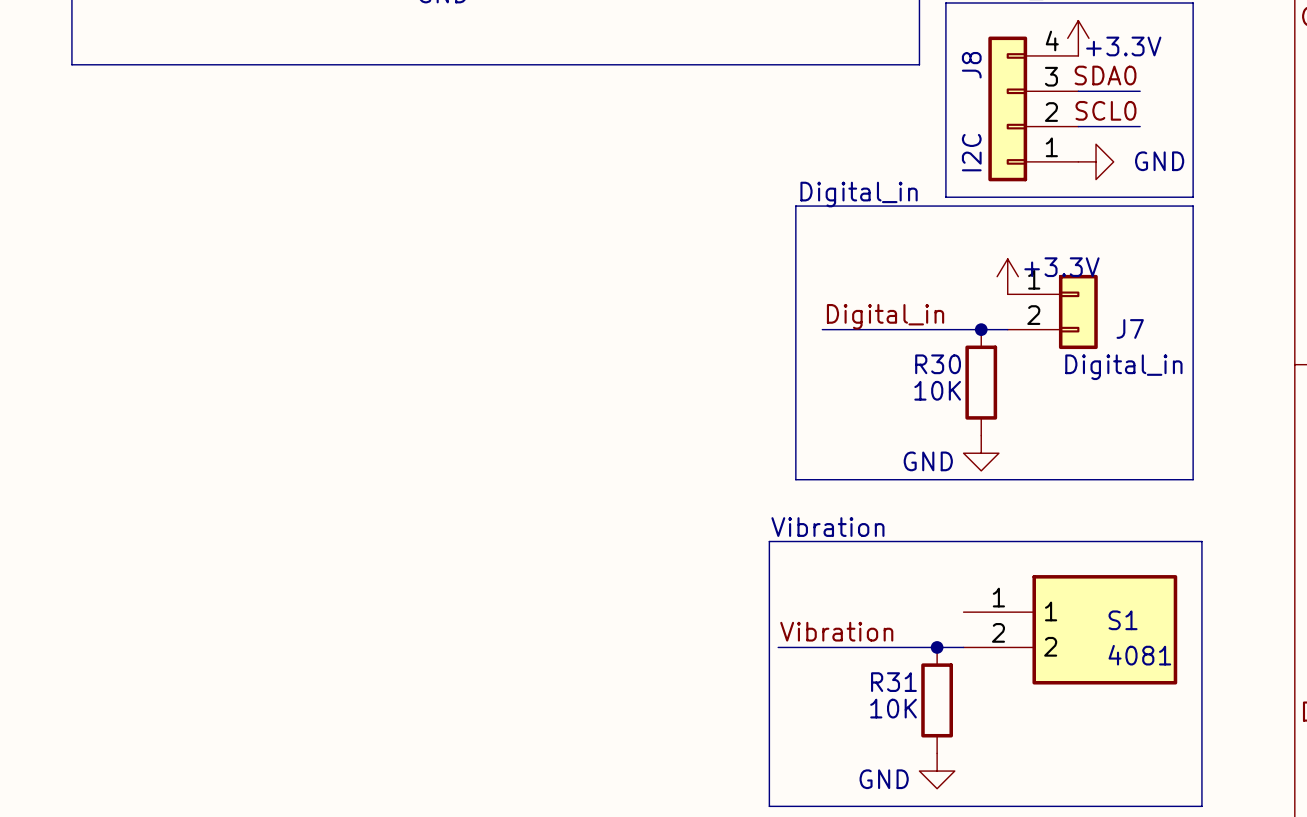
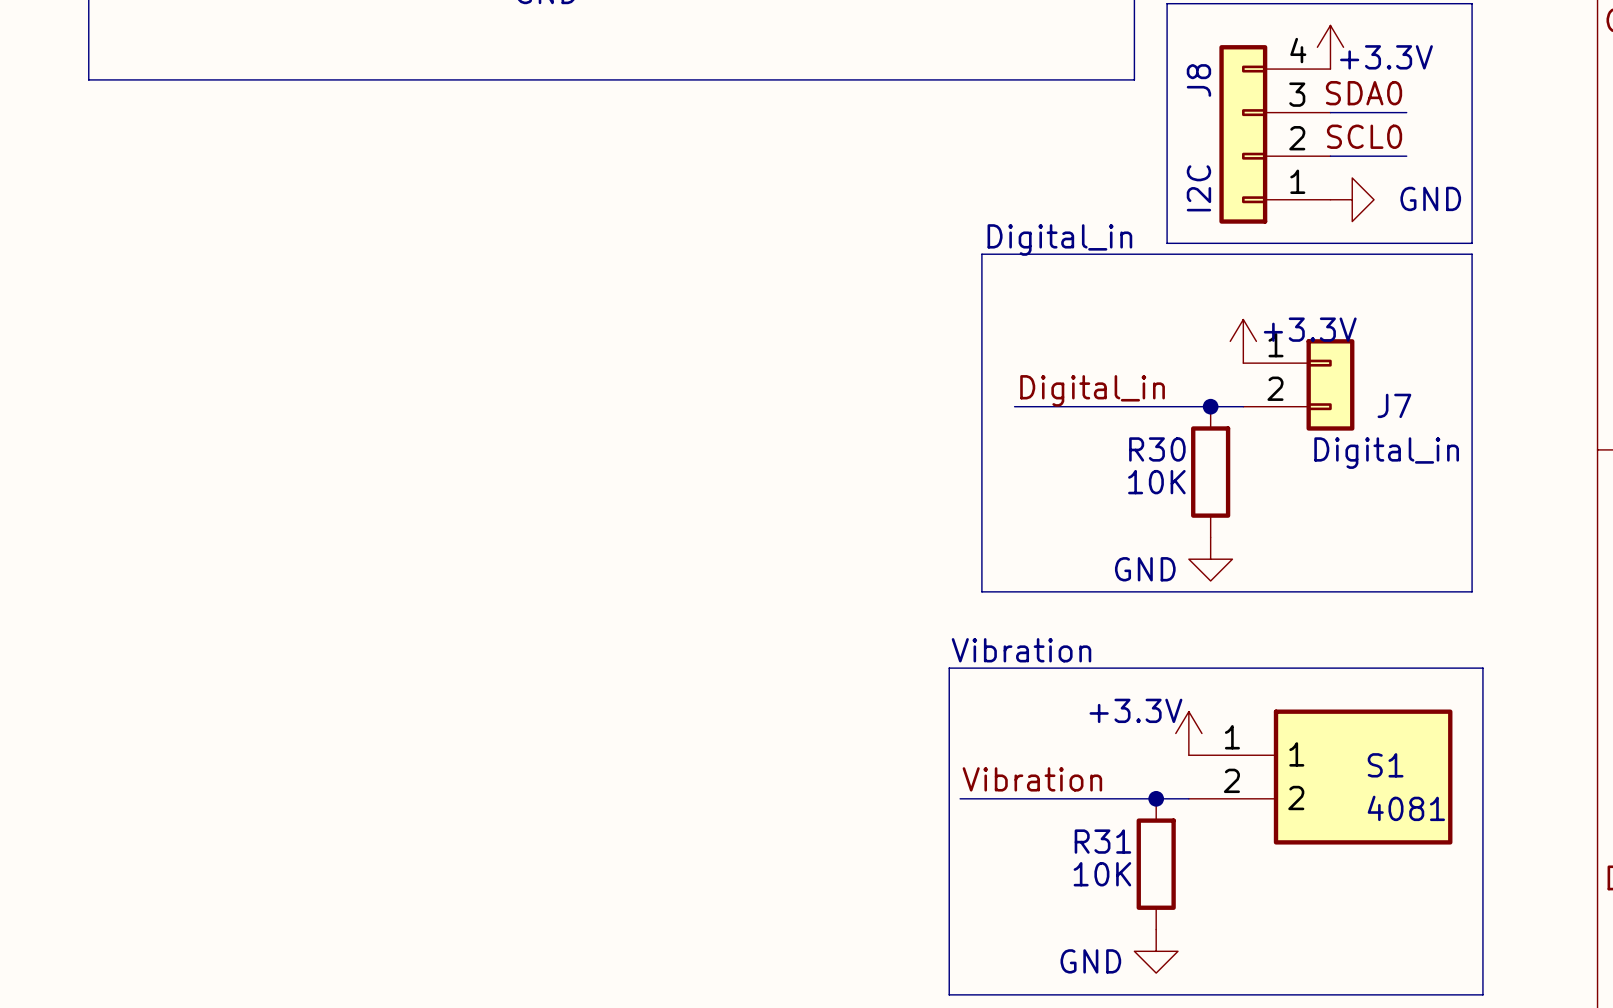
power symbol: none -> +3.3V (1188, 733)

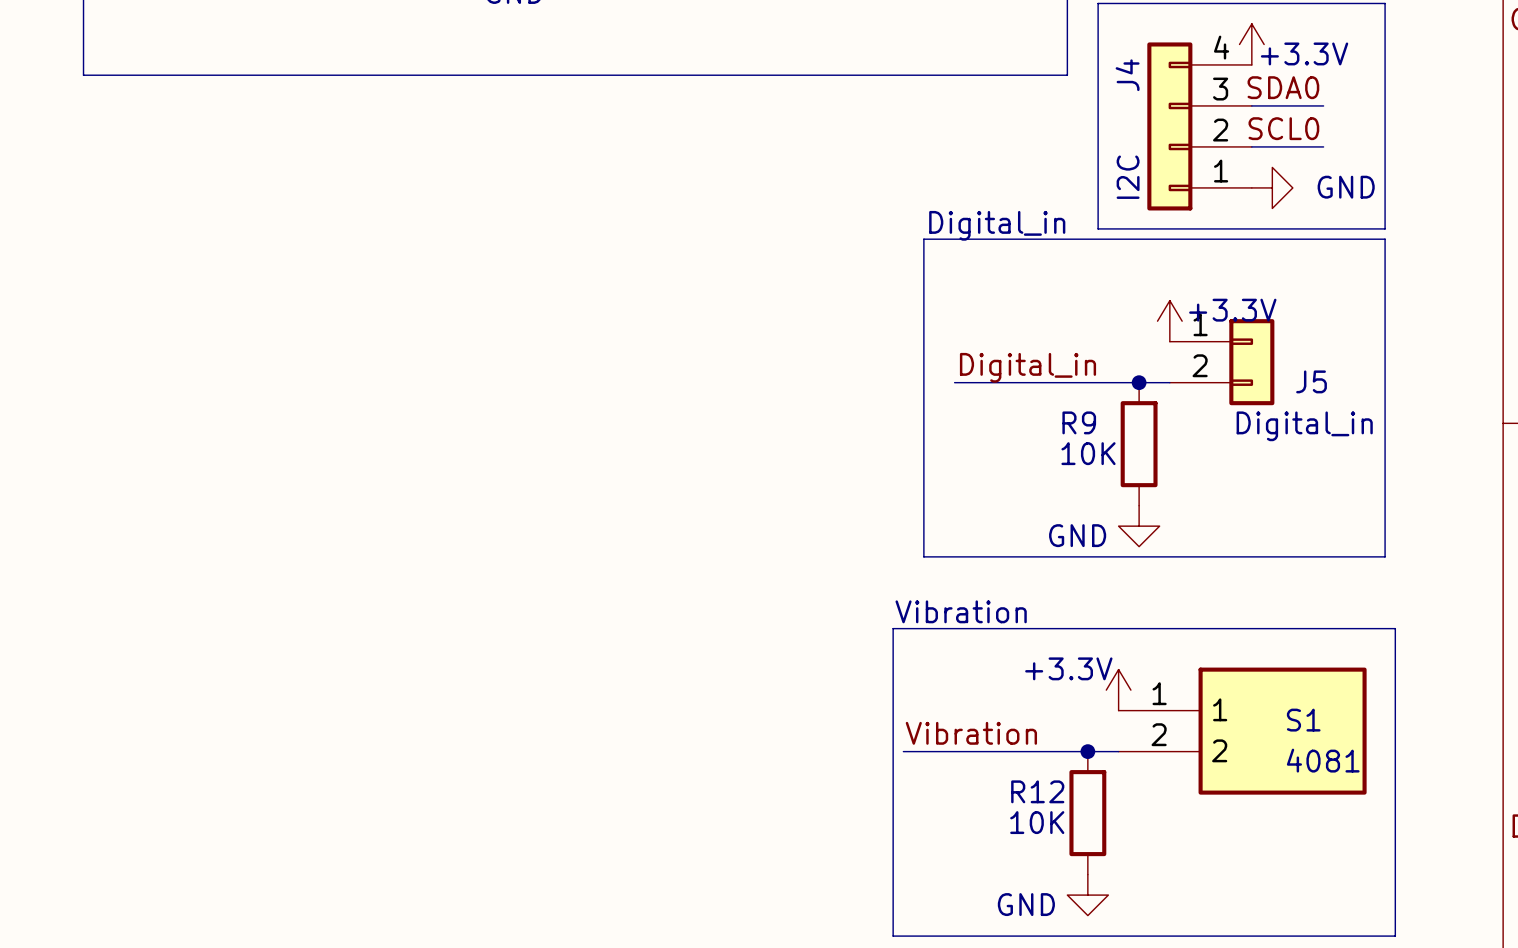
J8 name: J8 (1198, 80) -> J4 (1127, 75)
J7 name: J7 (1394, 405) -> J5 (1311, 381)
R30 name: R30 (1157, 449) -> R9 (1079, 422)
R31 name: R31 (1102, 841) -> R12 (1037, 791)

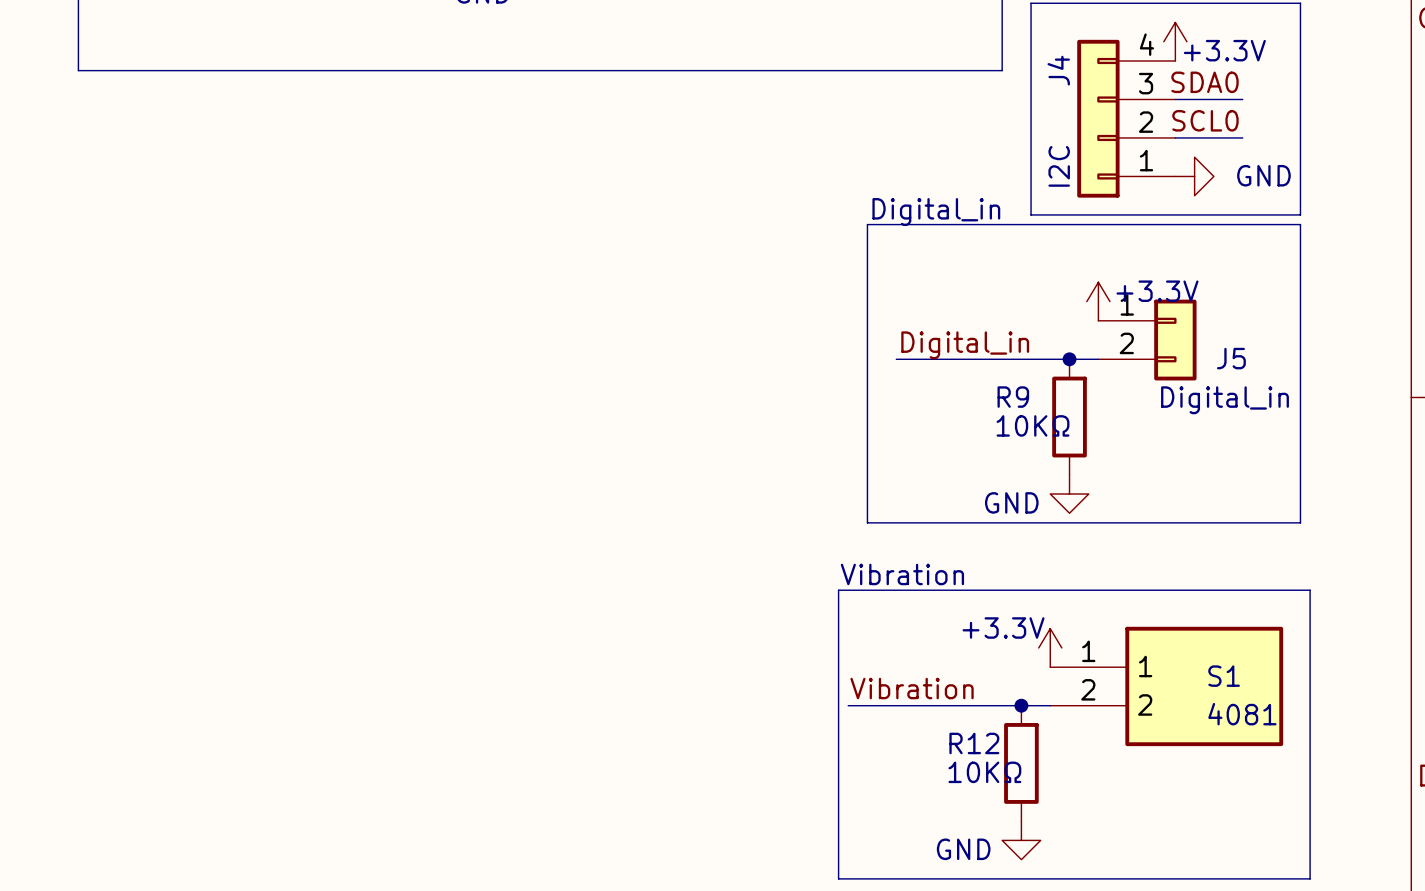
R9 value: 10K (1088, 453) -> 10KΩ (1033, 425)
R12 value: 10K (1037, 822) -> 10KΩ (984, 772)

